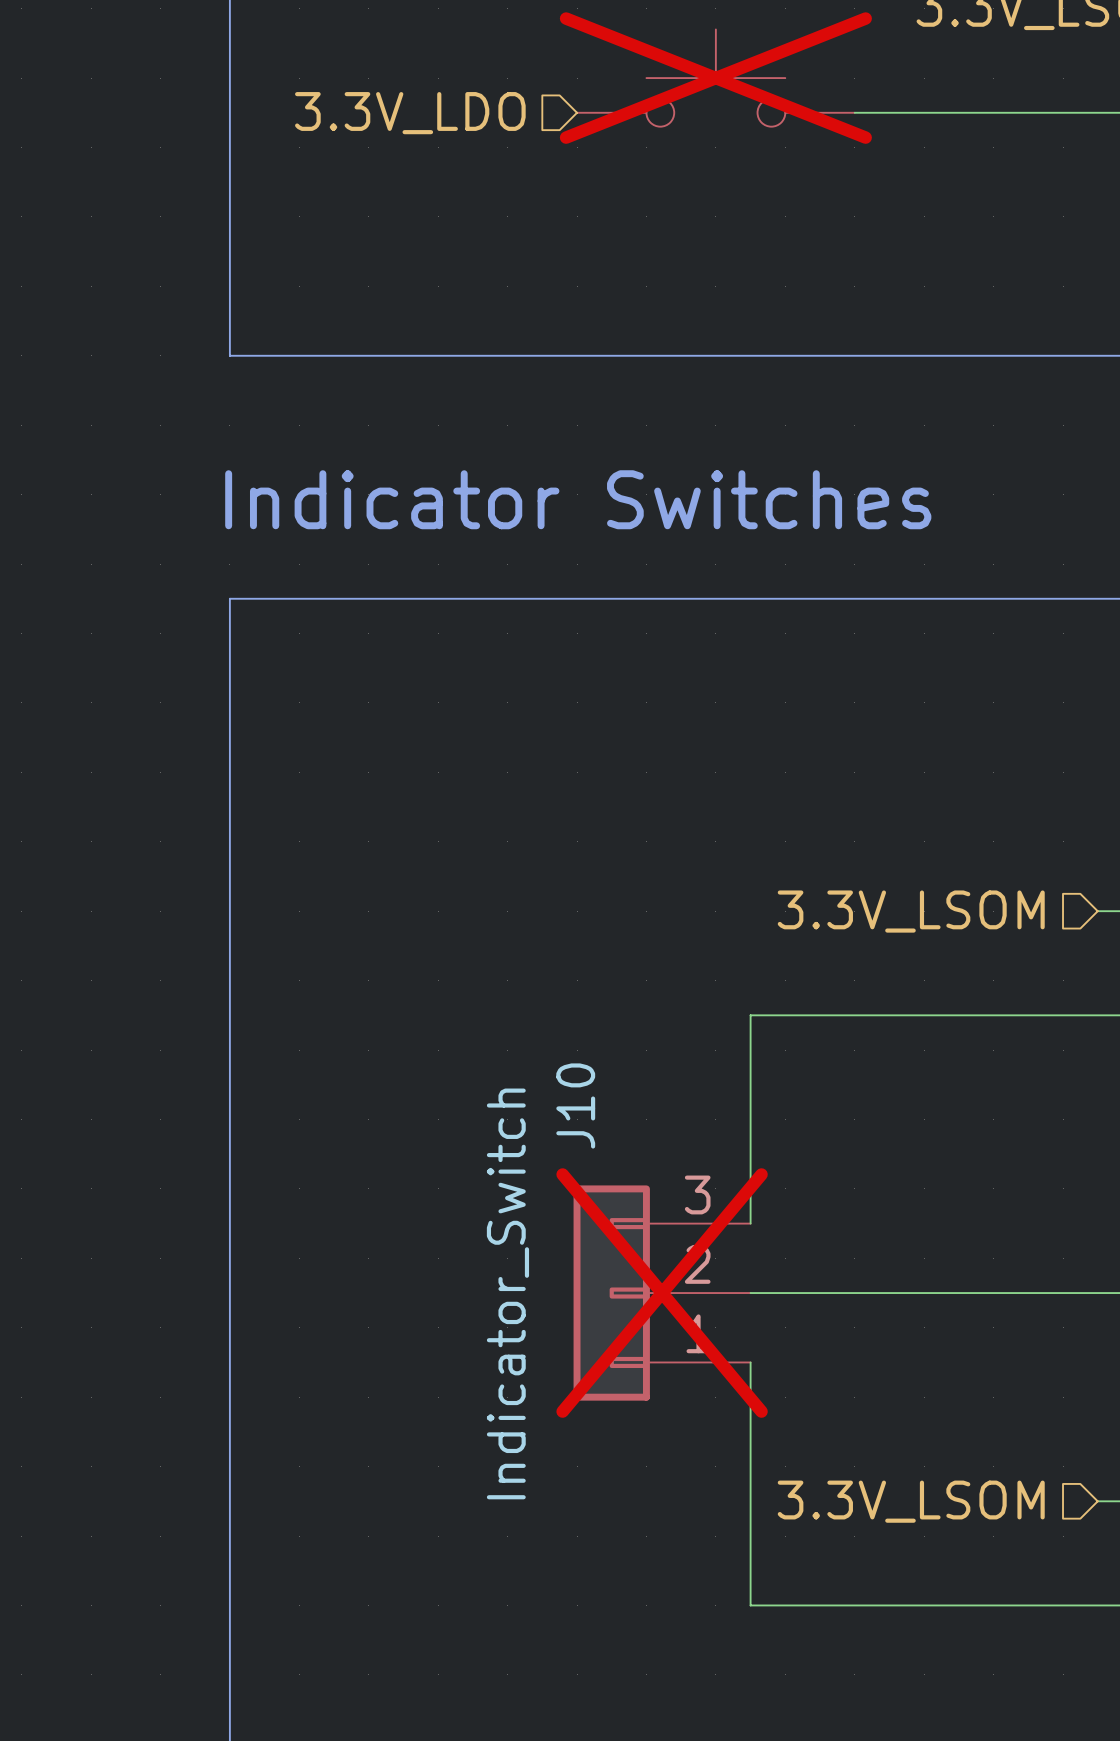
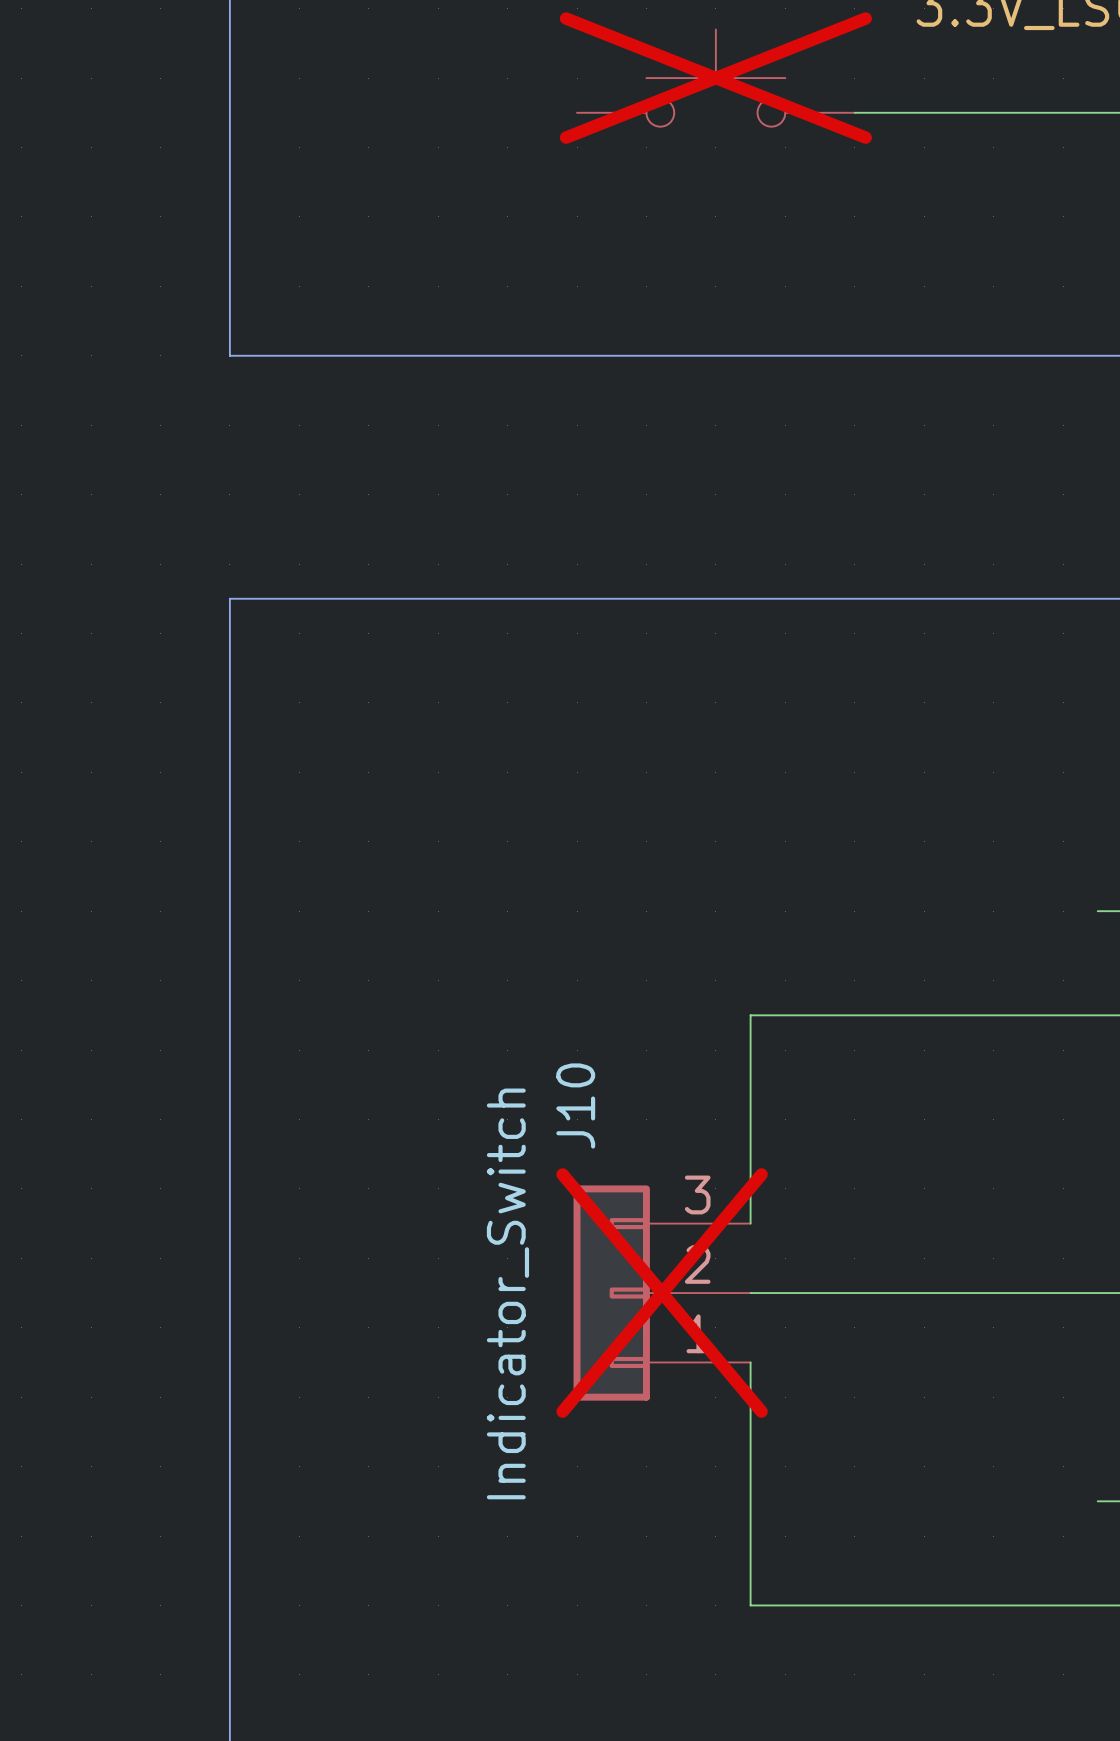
hierarchical label: 3.3V_LDO (410, 113) -> none
text: Indicator Switches (578, 499) -> none
hierarchical label: 3.3V_LSOM (911, 911) -> none
hierarchical label: 3.3V_LSOM (911, 1501) -> none

